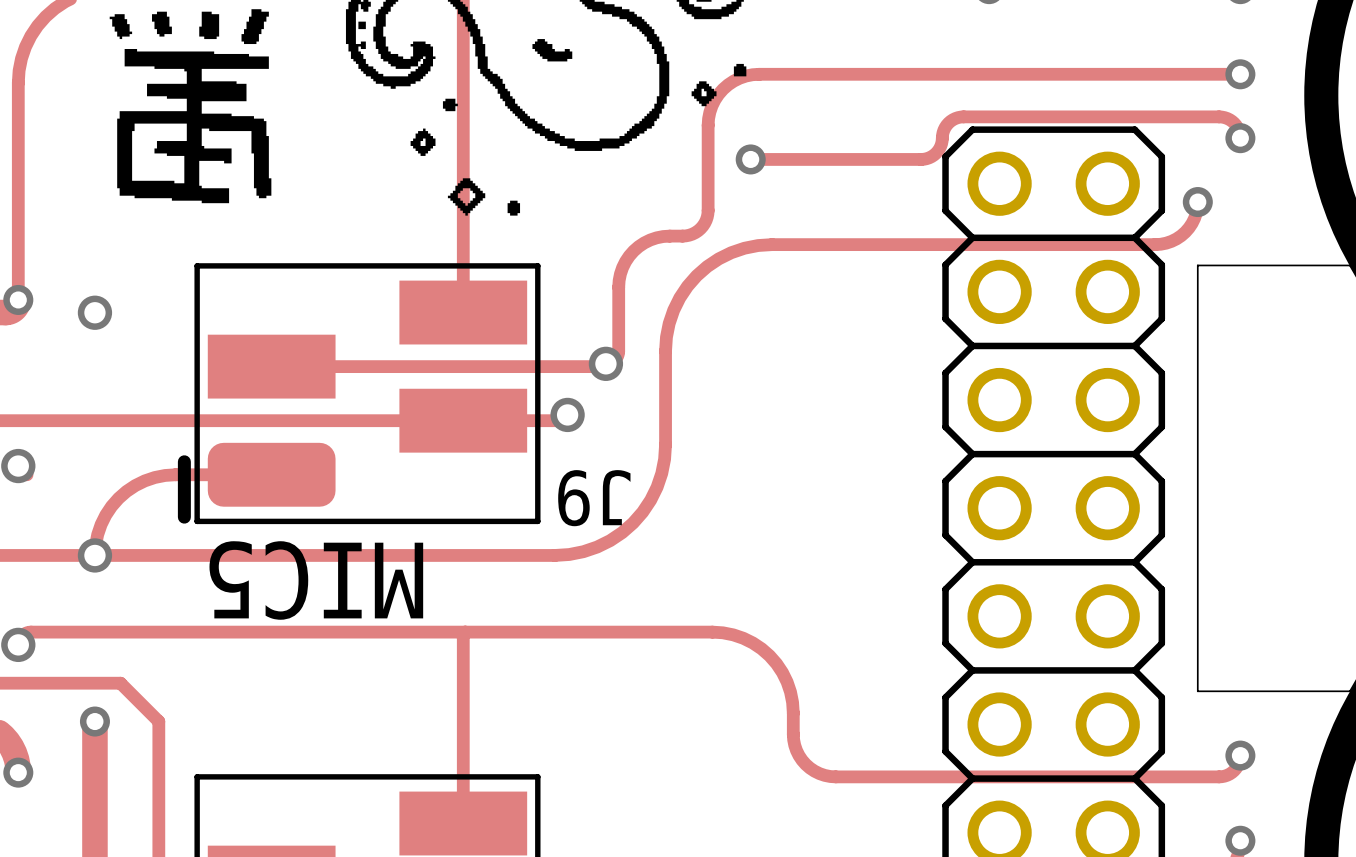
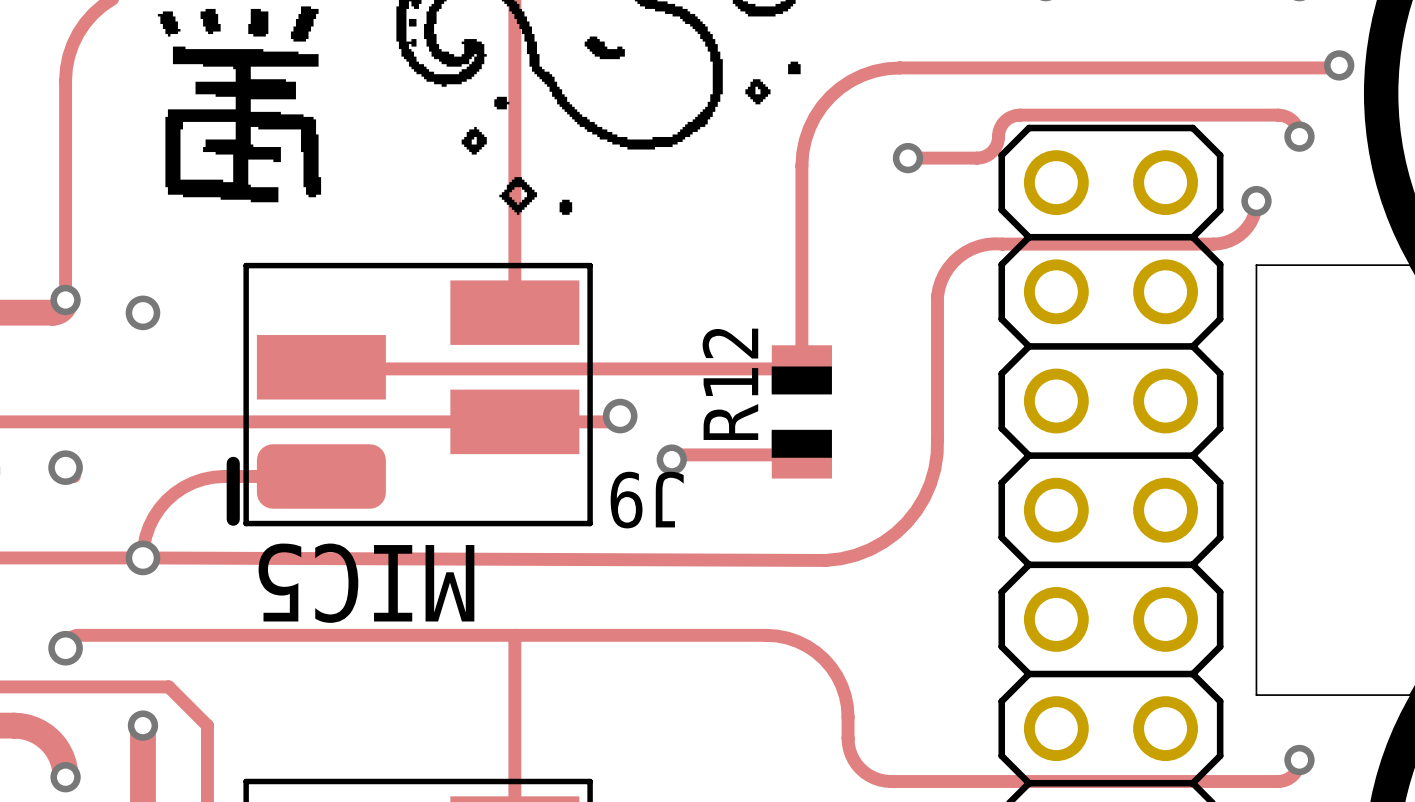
track: (1240, 74) (759, 74) (746, 76) (733, 81) (723, 89) (714, 99) (709, 112) (708, 125) (708, 210) (704, 223) (698, 230) (689, 235) (663, 236) (644, 242) (629, 256) (622, 267) (618, 287) (618, 352) (612, 362) (603, 366) (271, 366) -> (1339, 65) (1336, 67) (899, 67) (874, 71) (850, 81) (830, 96) (815, 116) (805, 140) (802, 153) (801, 368) (323, 368) (321, 367)
via position: (1240, 74) -> (1339, 65)
track: (750, 159) (852, 159) -> none
via position: (750, 159) -> (908, 158)
track: (946, 244) (758, 245) (731, 252) (707, 266) (687, 286) (673, 310) (669, 323) (665, 351) (664, 459) (657, 487) (650, 500) (633, 523) (622, 532) (597, 547) (583, 551) (554, 555) (94, 555) -> (1002, 244) (979, 246) (965, 252) (953, 262) (944, 274) (937, 296) (937, 453) (930, 483) (924, 497) (906, 522) (883, 542) (855, 555) (825, 560) (142, 557)
via: (605, 363) -> none
R12: none -> (801, 411)
track: none -> (801, 454) (676, 454) (671, 459)
via: none -> (671, 459)

